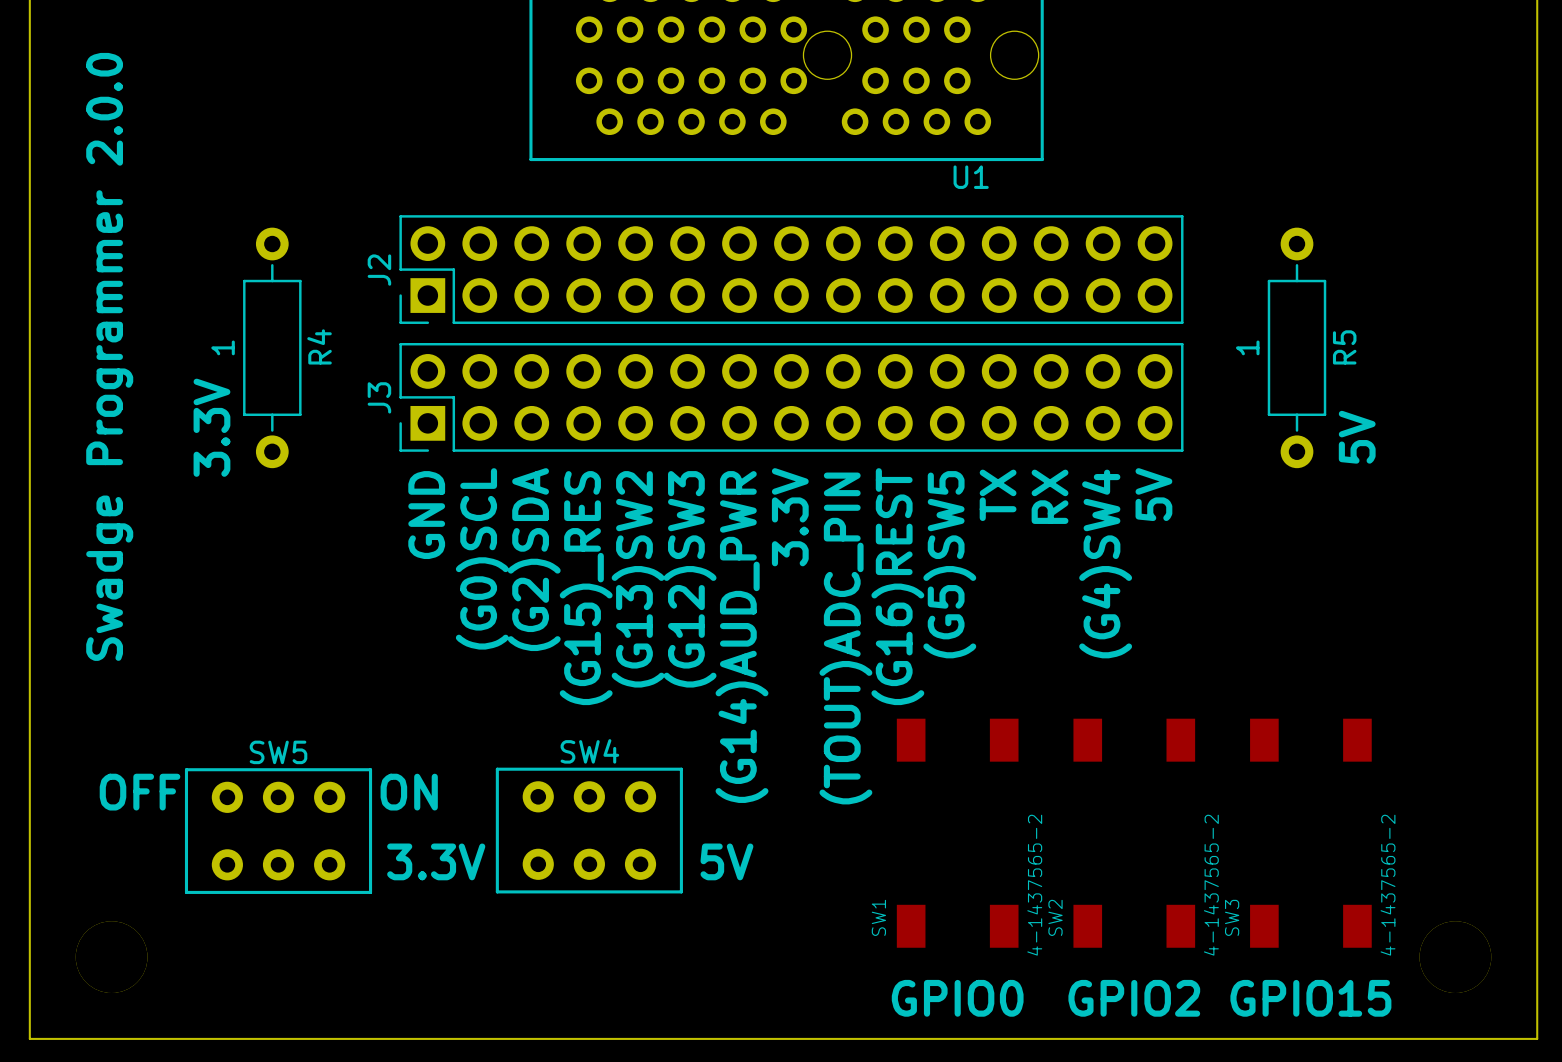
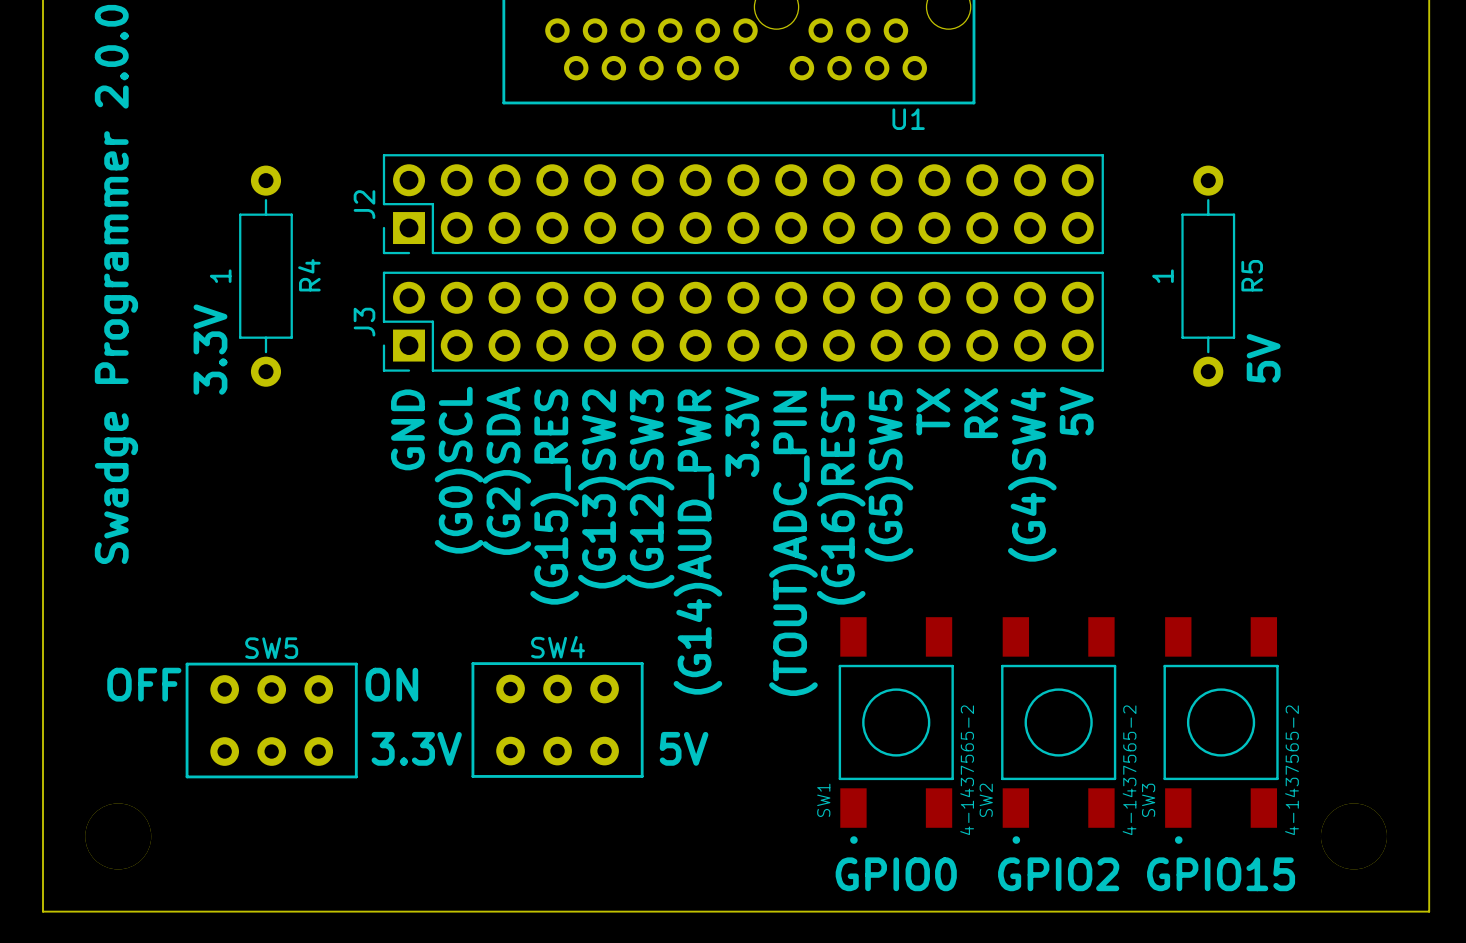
SW1 footprint: [896, 718, 1019, 948] -> [838, 617, 954, 844]
SW2 footprint: [1073, 718, 1196, 948] -> [1001, 617, 1117, 844]
SW3 footprint: [1250, 718, 1372, 948] -> [1163, 617, 1279, 844]

